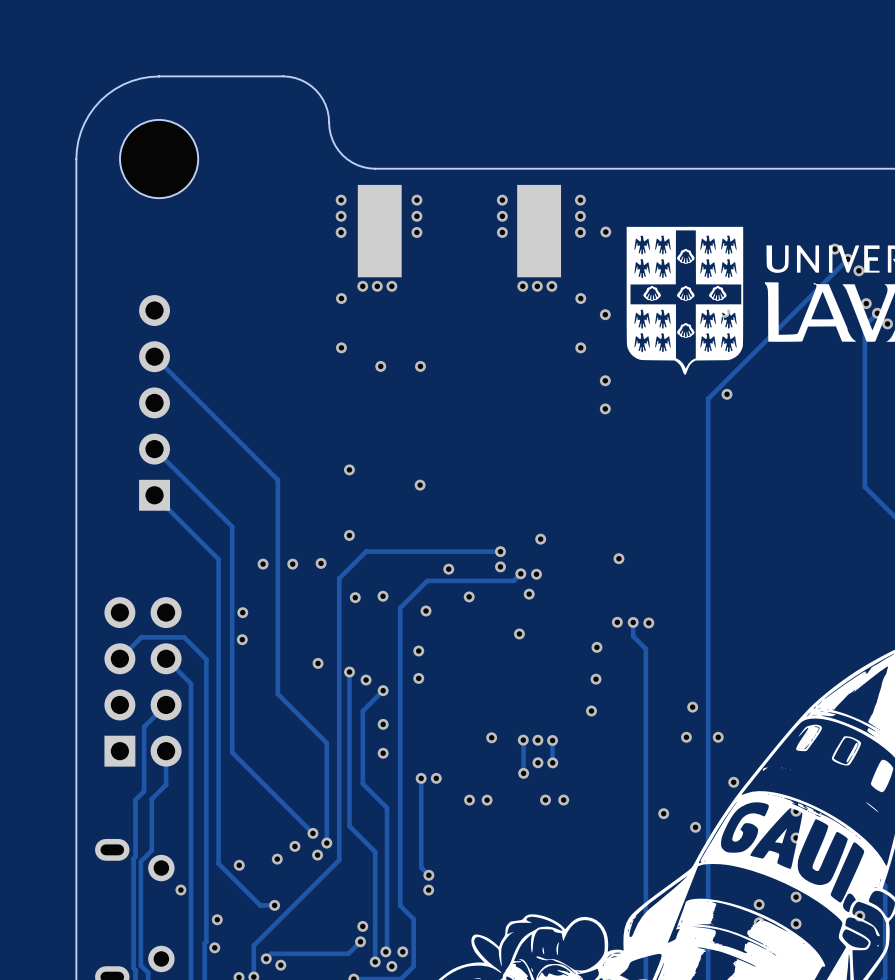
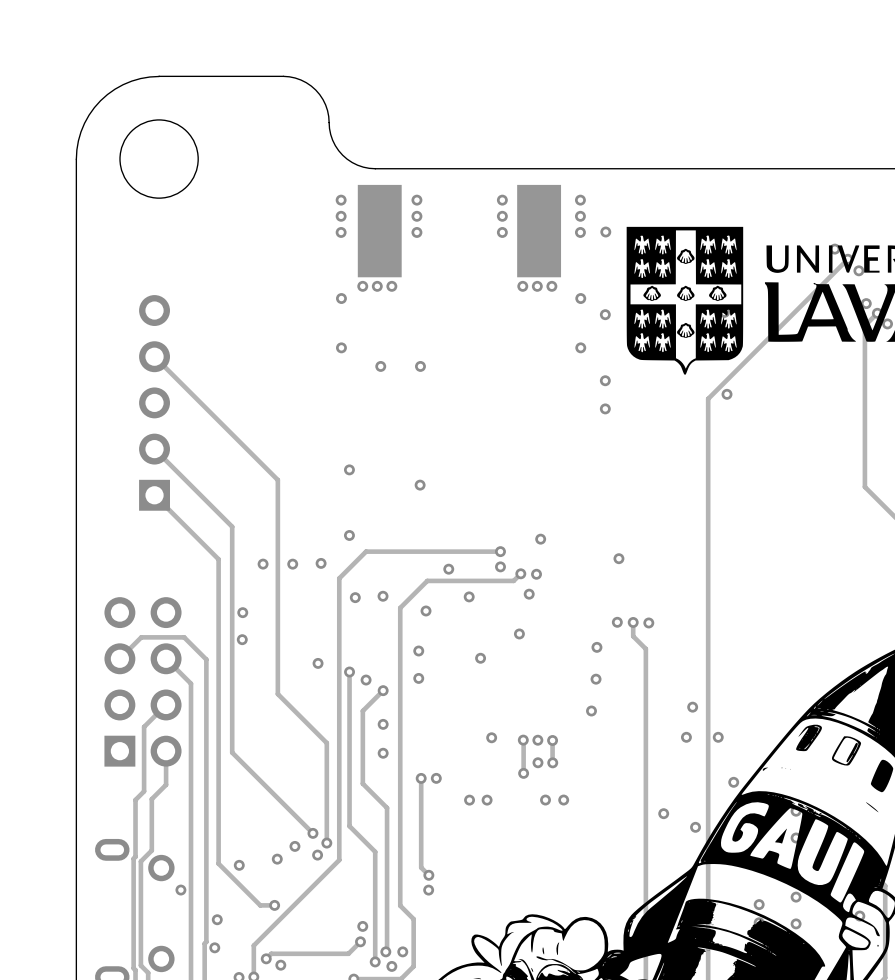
via: none -> (480, 658)

